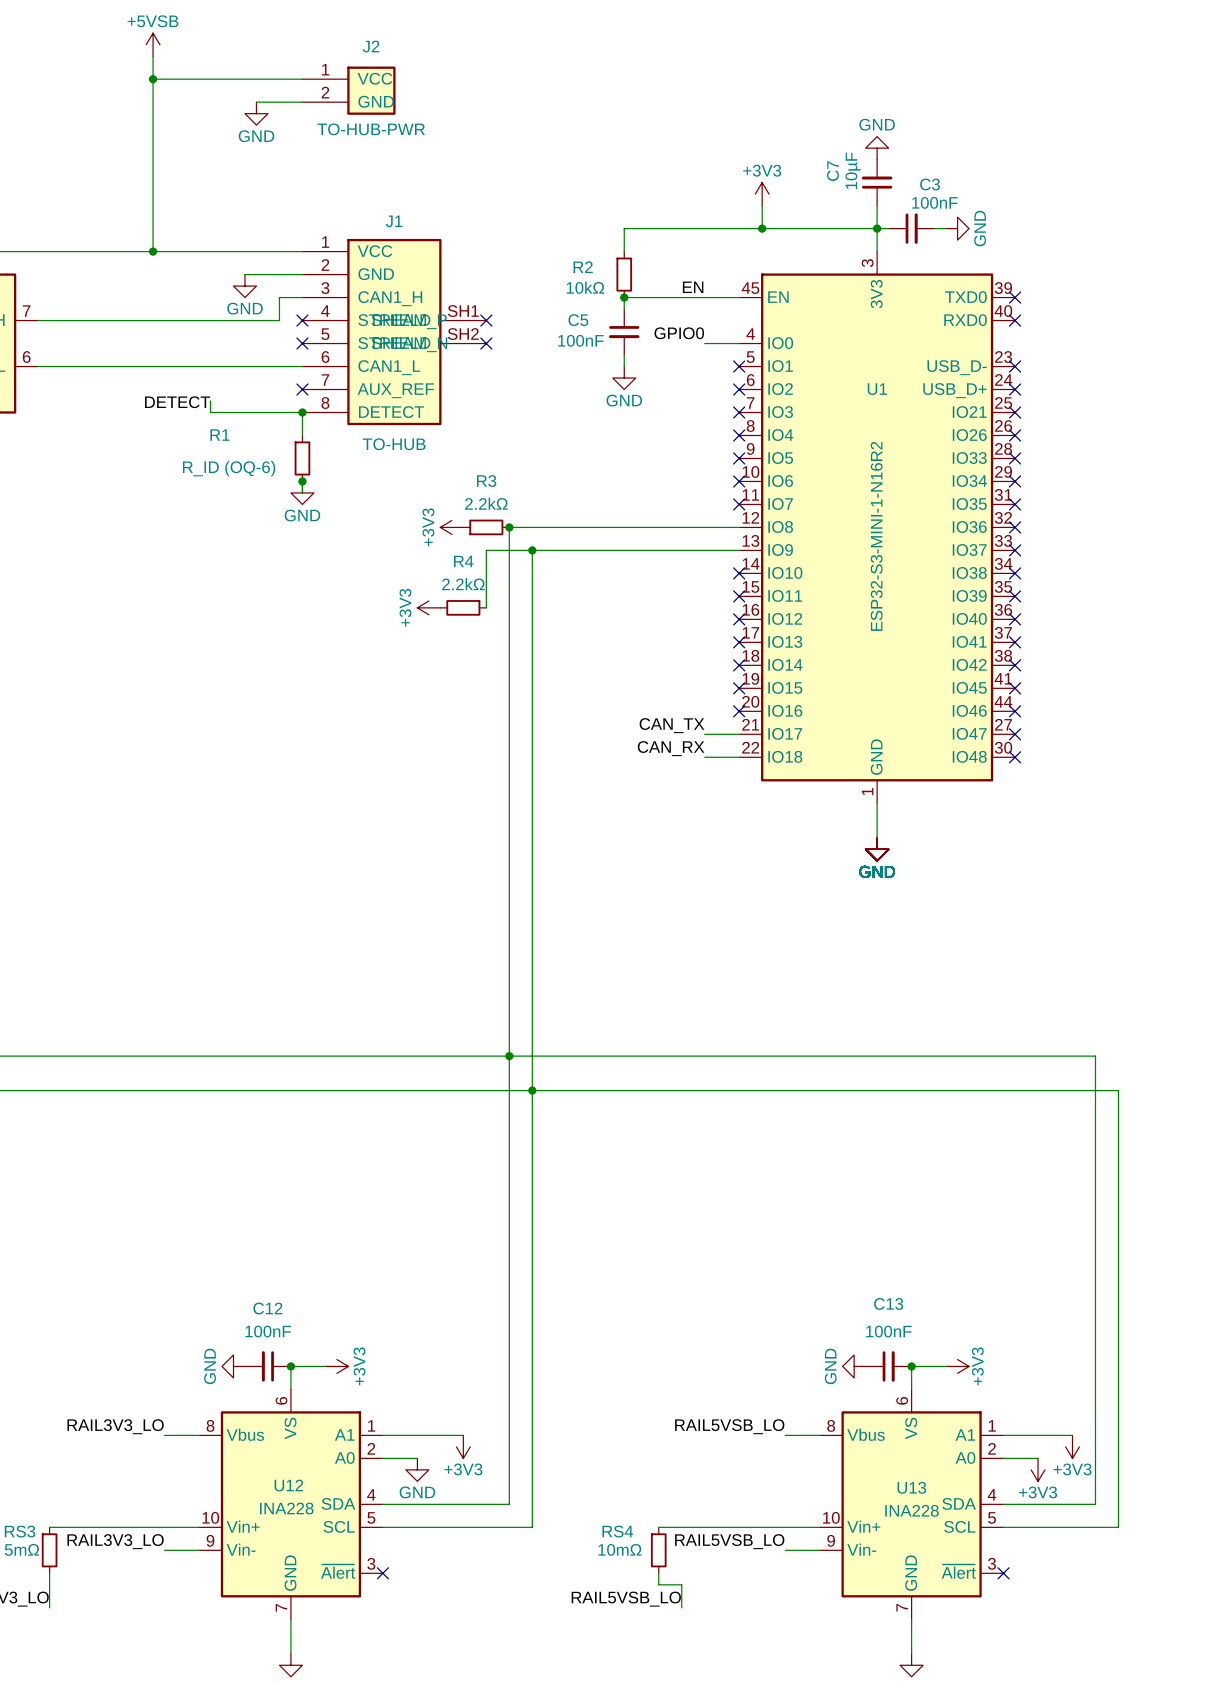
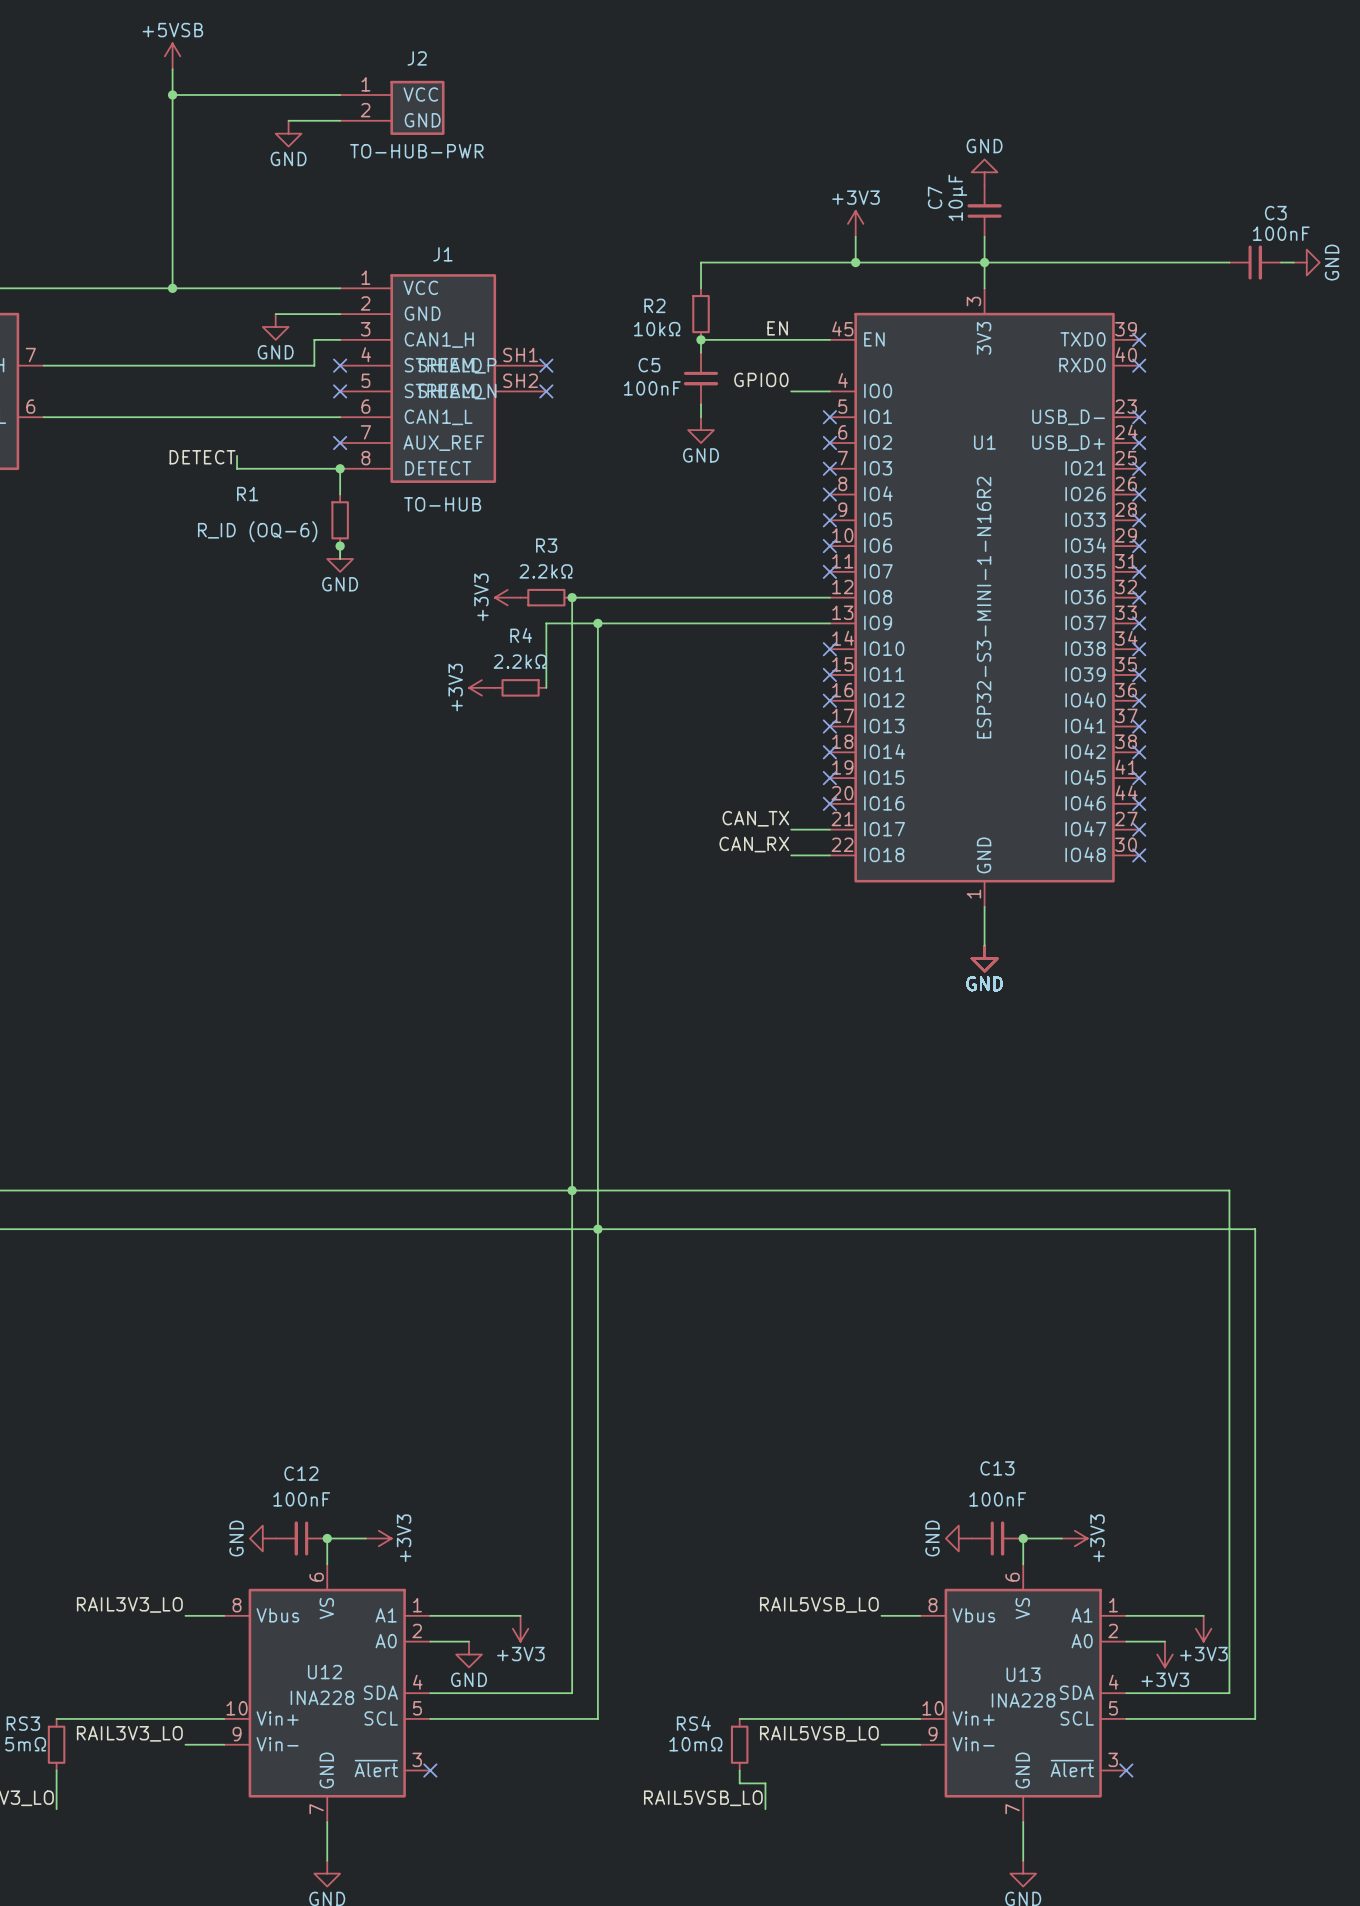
C3 position: (911, 228) -> (1255, 262)
wire: none -> (1061, 262) (1229, 262)
power symbol position: GND (957, 228) -> GND (1306, 262)
wire: none -> (1281, 262) (1293, 262)

